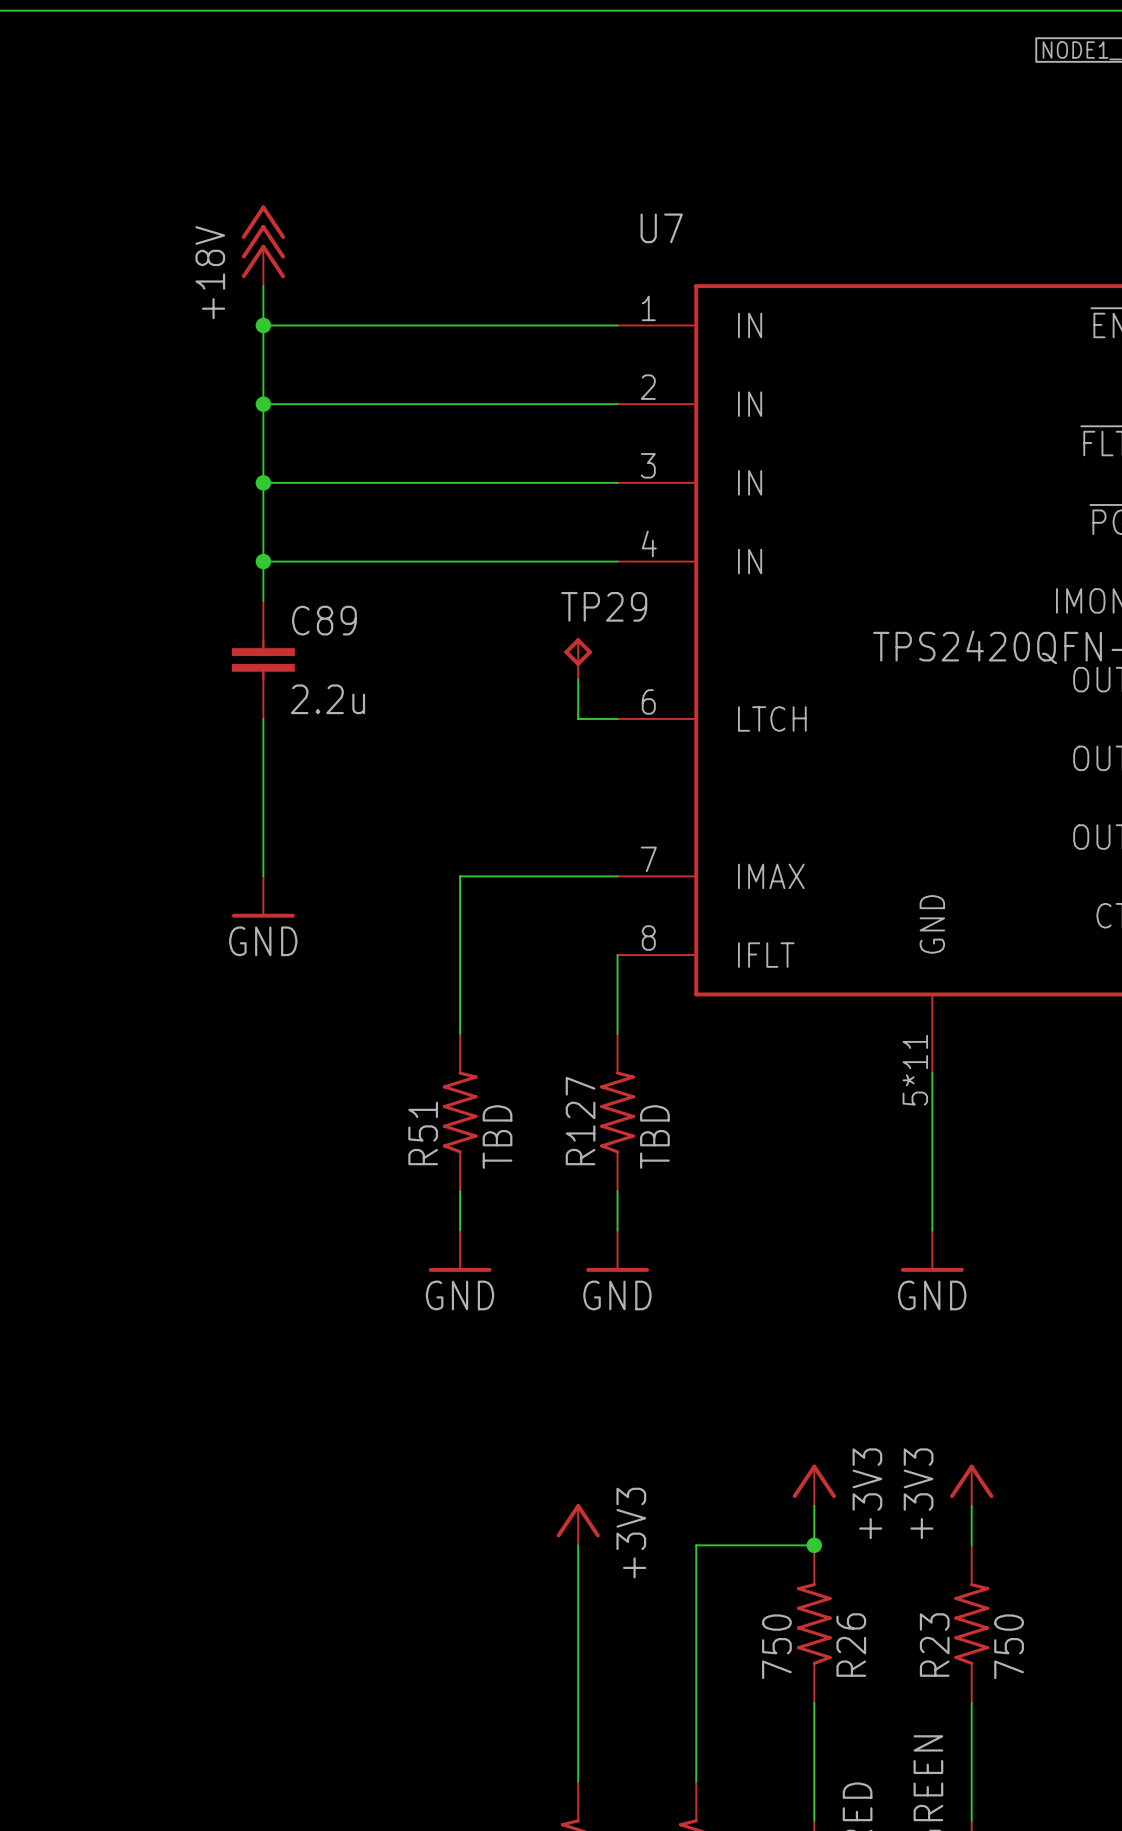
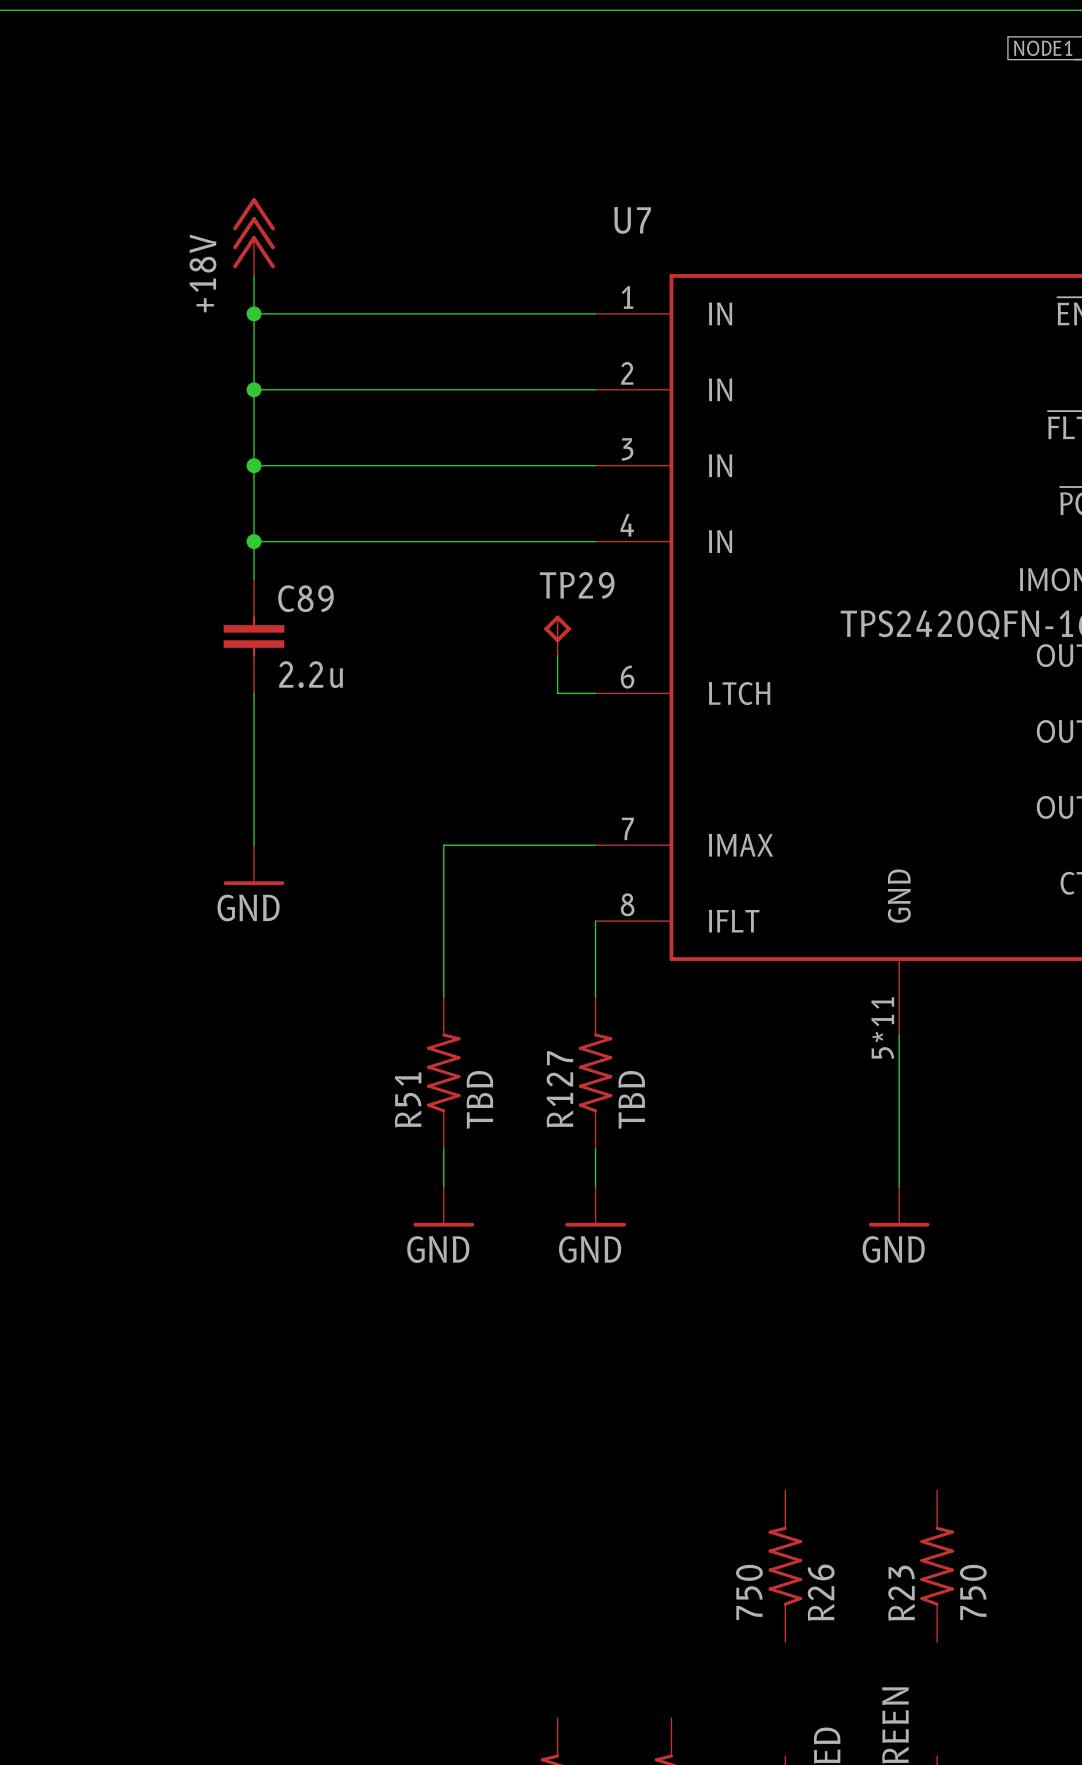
power symbol: +3V3 (814, 1485) -> none
power symbol: +3V3 (971, 1485) -> none
wire: (814, 1505) (814, 1545) (696, 1545) (696, 1781) -> none
wire: (971, 1505) (971, 1545) -> none
power symbol: +3V3 (578, 1524) -> none
wire: (578, 1545) (578, 1781) -> none
junction: (814, 1545) -> none
wire: (814, 1702) (814, 1820) -> none
wire: (971, 1702) (971, 1820) -> none

